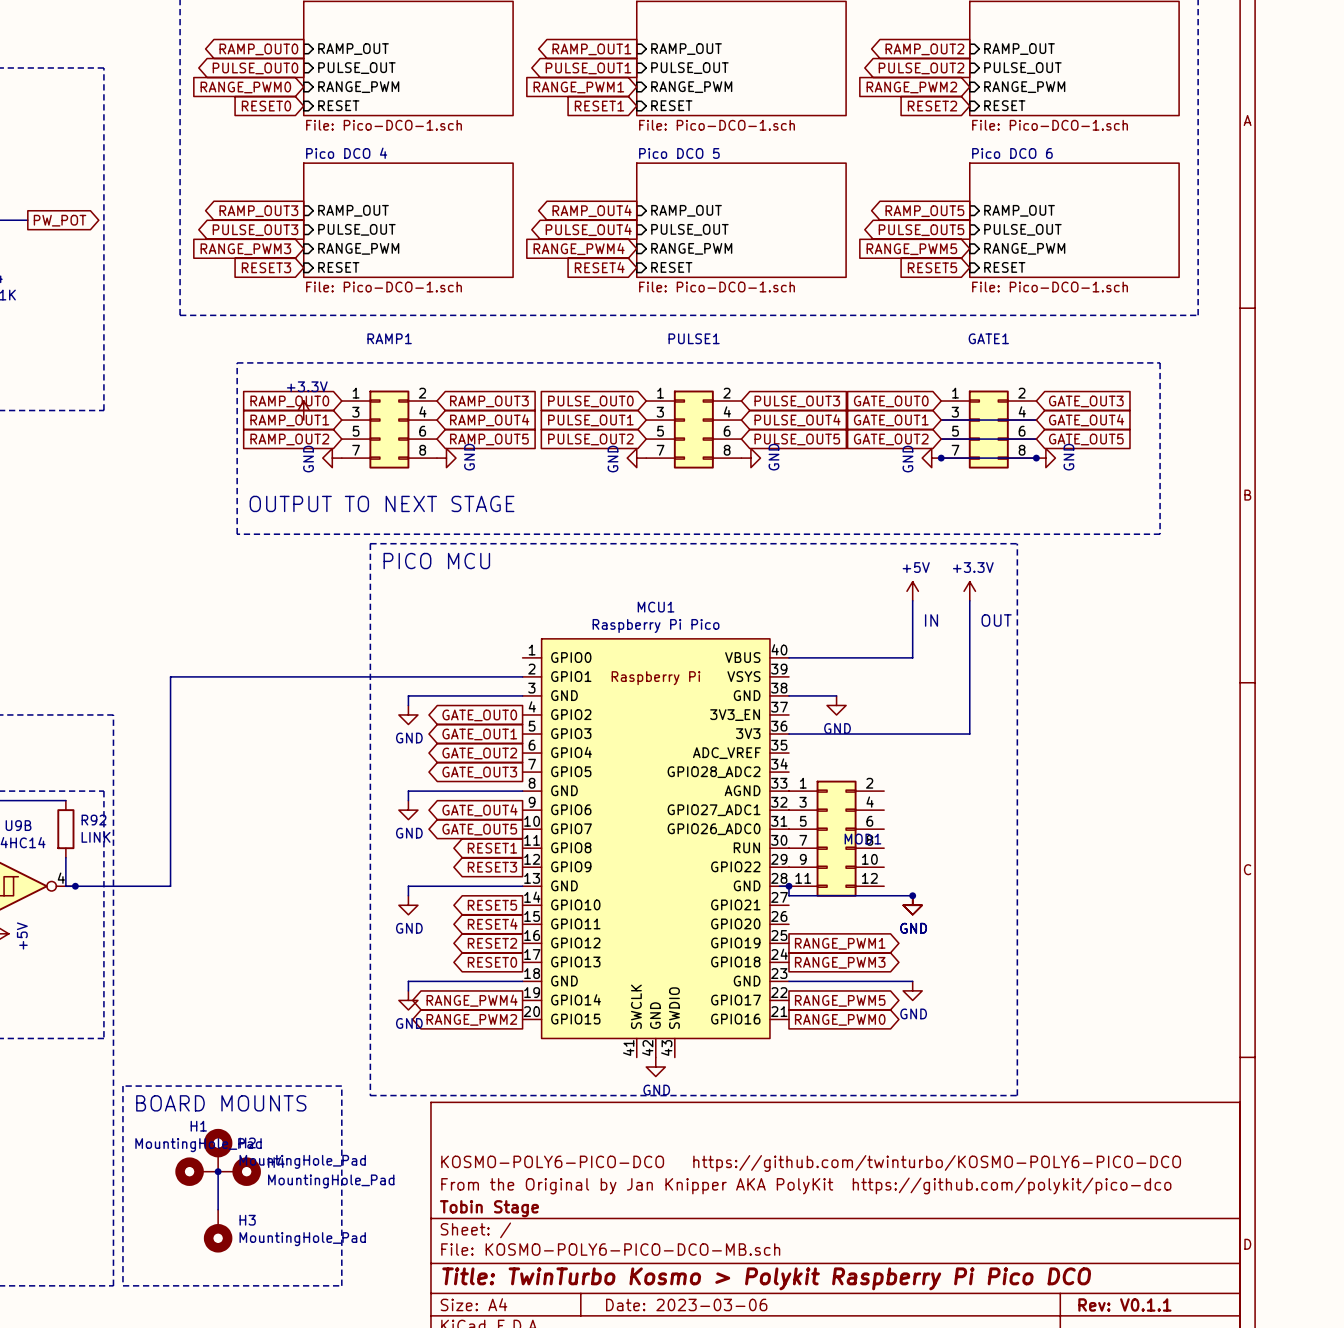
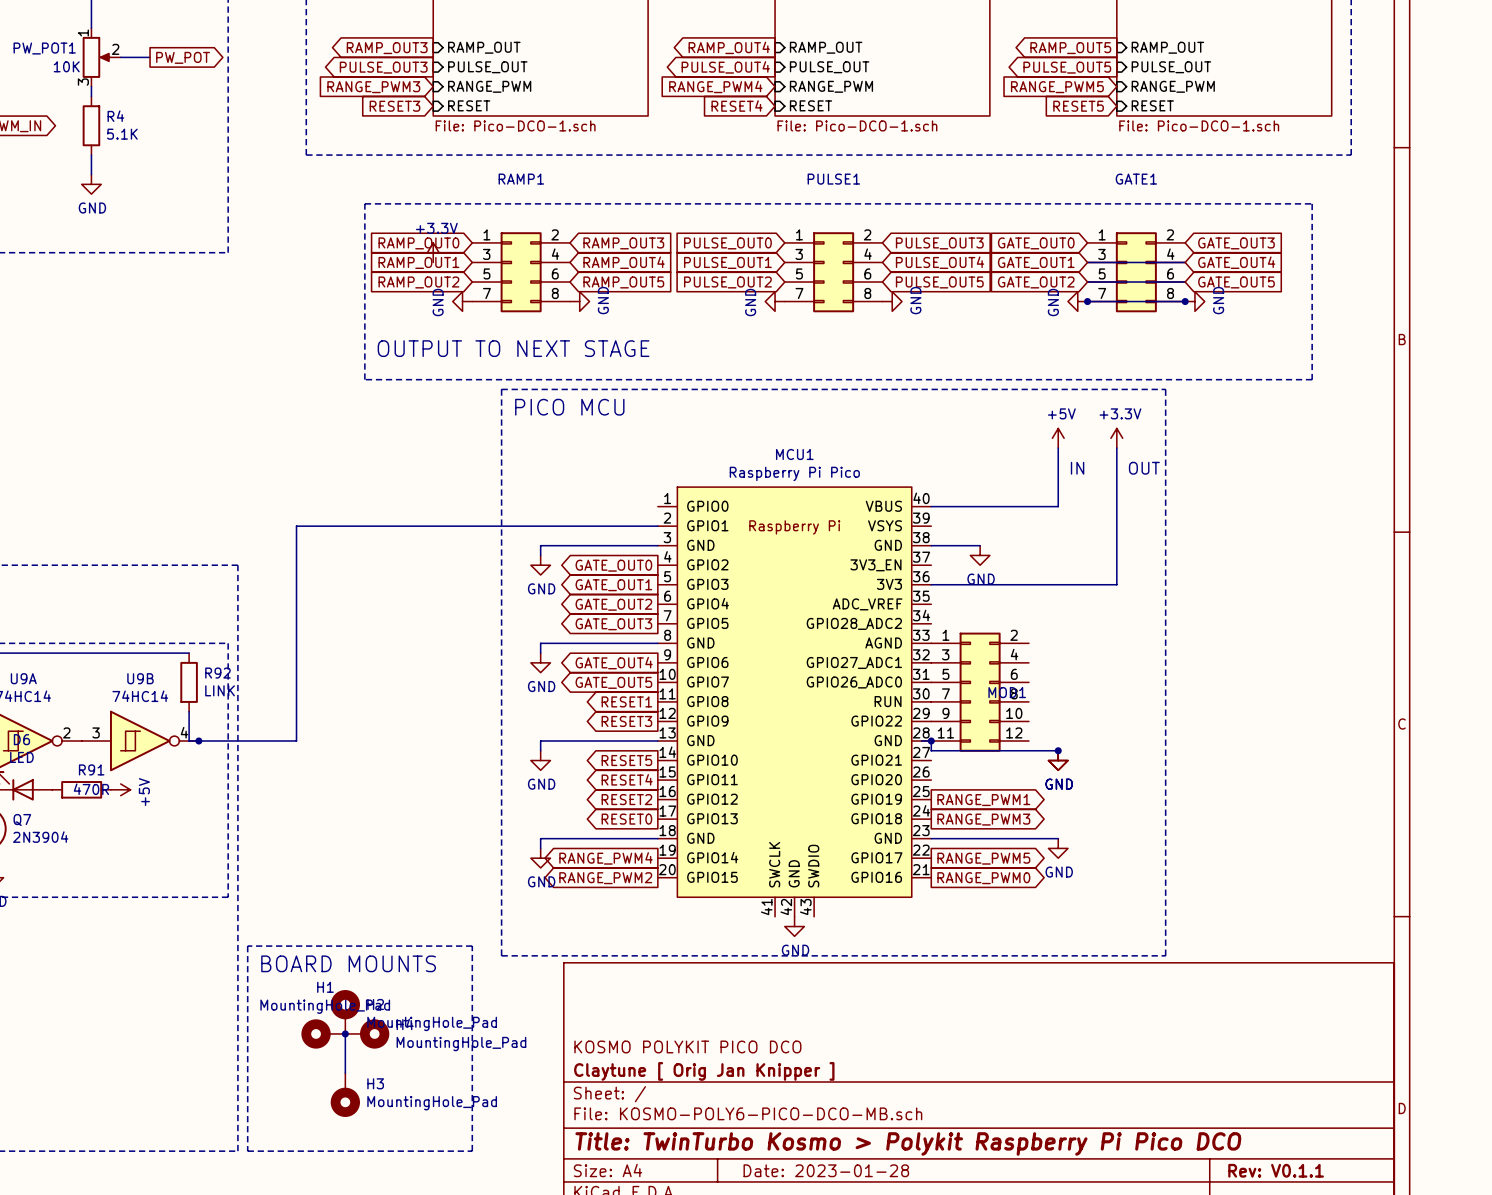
title block: KOSMO-POLY6-PICO-DCO https://github.com/twinturbo/KOSMO-POLY6-PICO-DCO (811, 1163) -> none
title block: From the Original by Jan Knipper AKA PolyKit https://github.com/polykit/pico-dco (806, 1185) -> KOSMO POLYKIT PICO DCO (687, 1046)
title block: Tobin Stage (489, 1208) -> Claytune [ Orig Jan Knipper ] (704, 1071)
title block: Date: 2023-03-06 (686, 1304) -> Date: 2023-01-28 (826, 1170)

